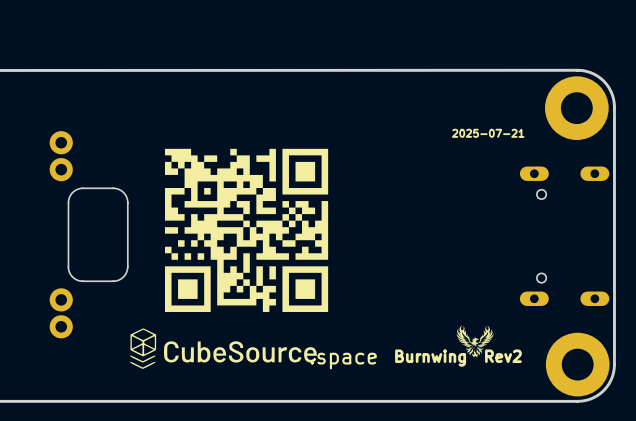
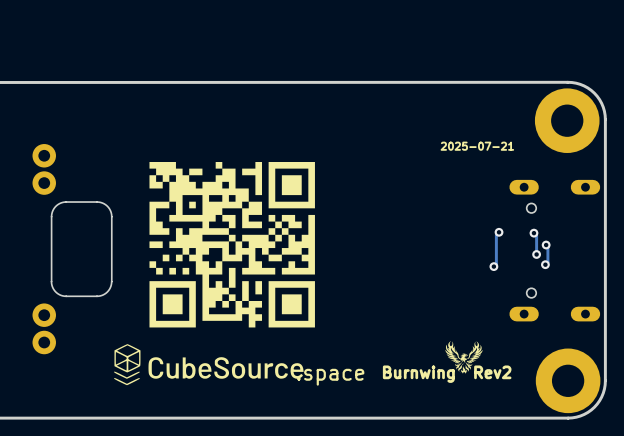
via: none -> (499, 232)
track: none -> (533, 233) (536, 235) (536, 254)
via: none -> (533, 233)
track: none -> (496, 234) (496, 264) (493, 266)
track: none -> (546, 245) (547, 246) (547, 262) (545, 264)
via: none -> (546, 245)
via: none -> (536, 254)
via: none -> (545, 264)
via: none -> (493, 266)

